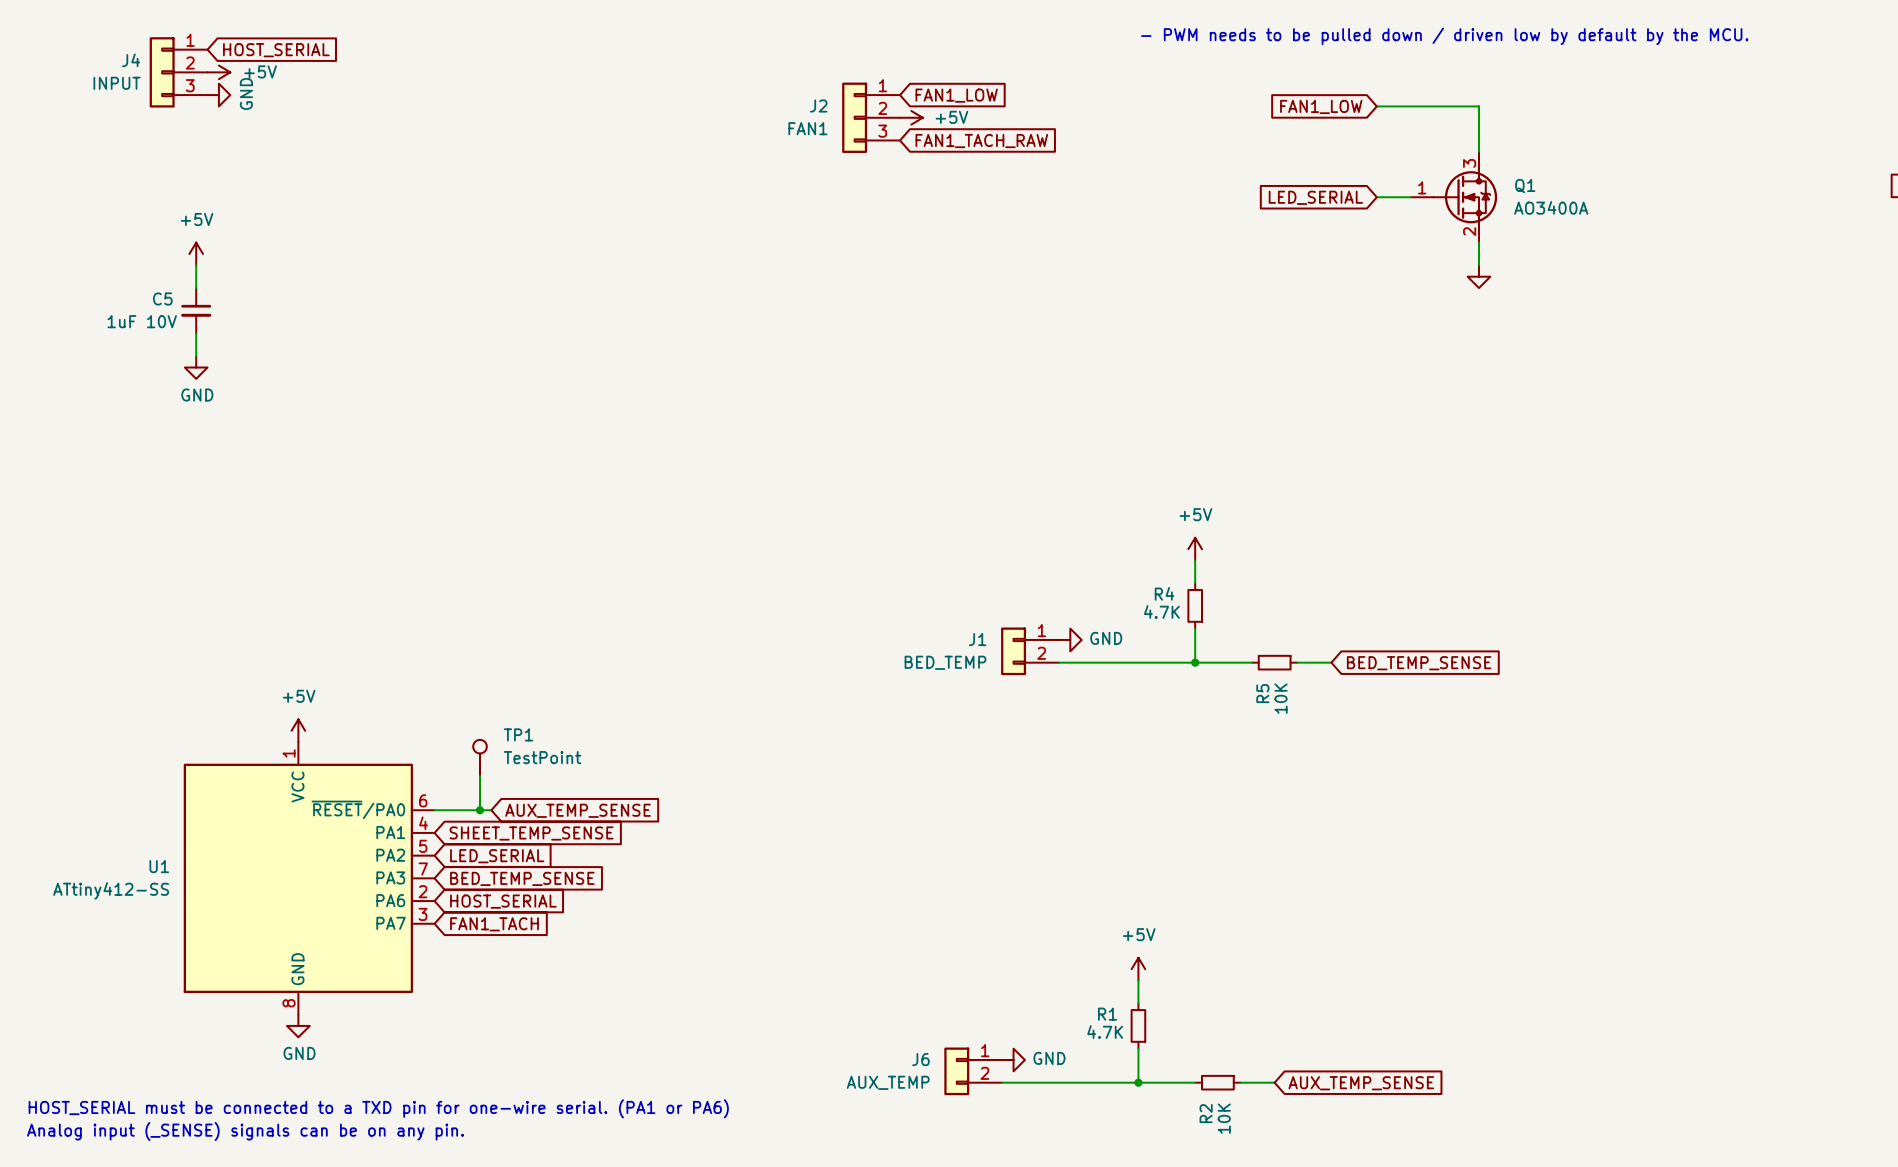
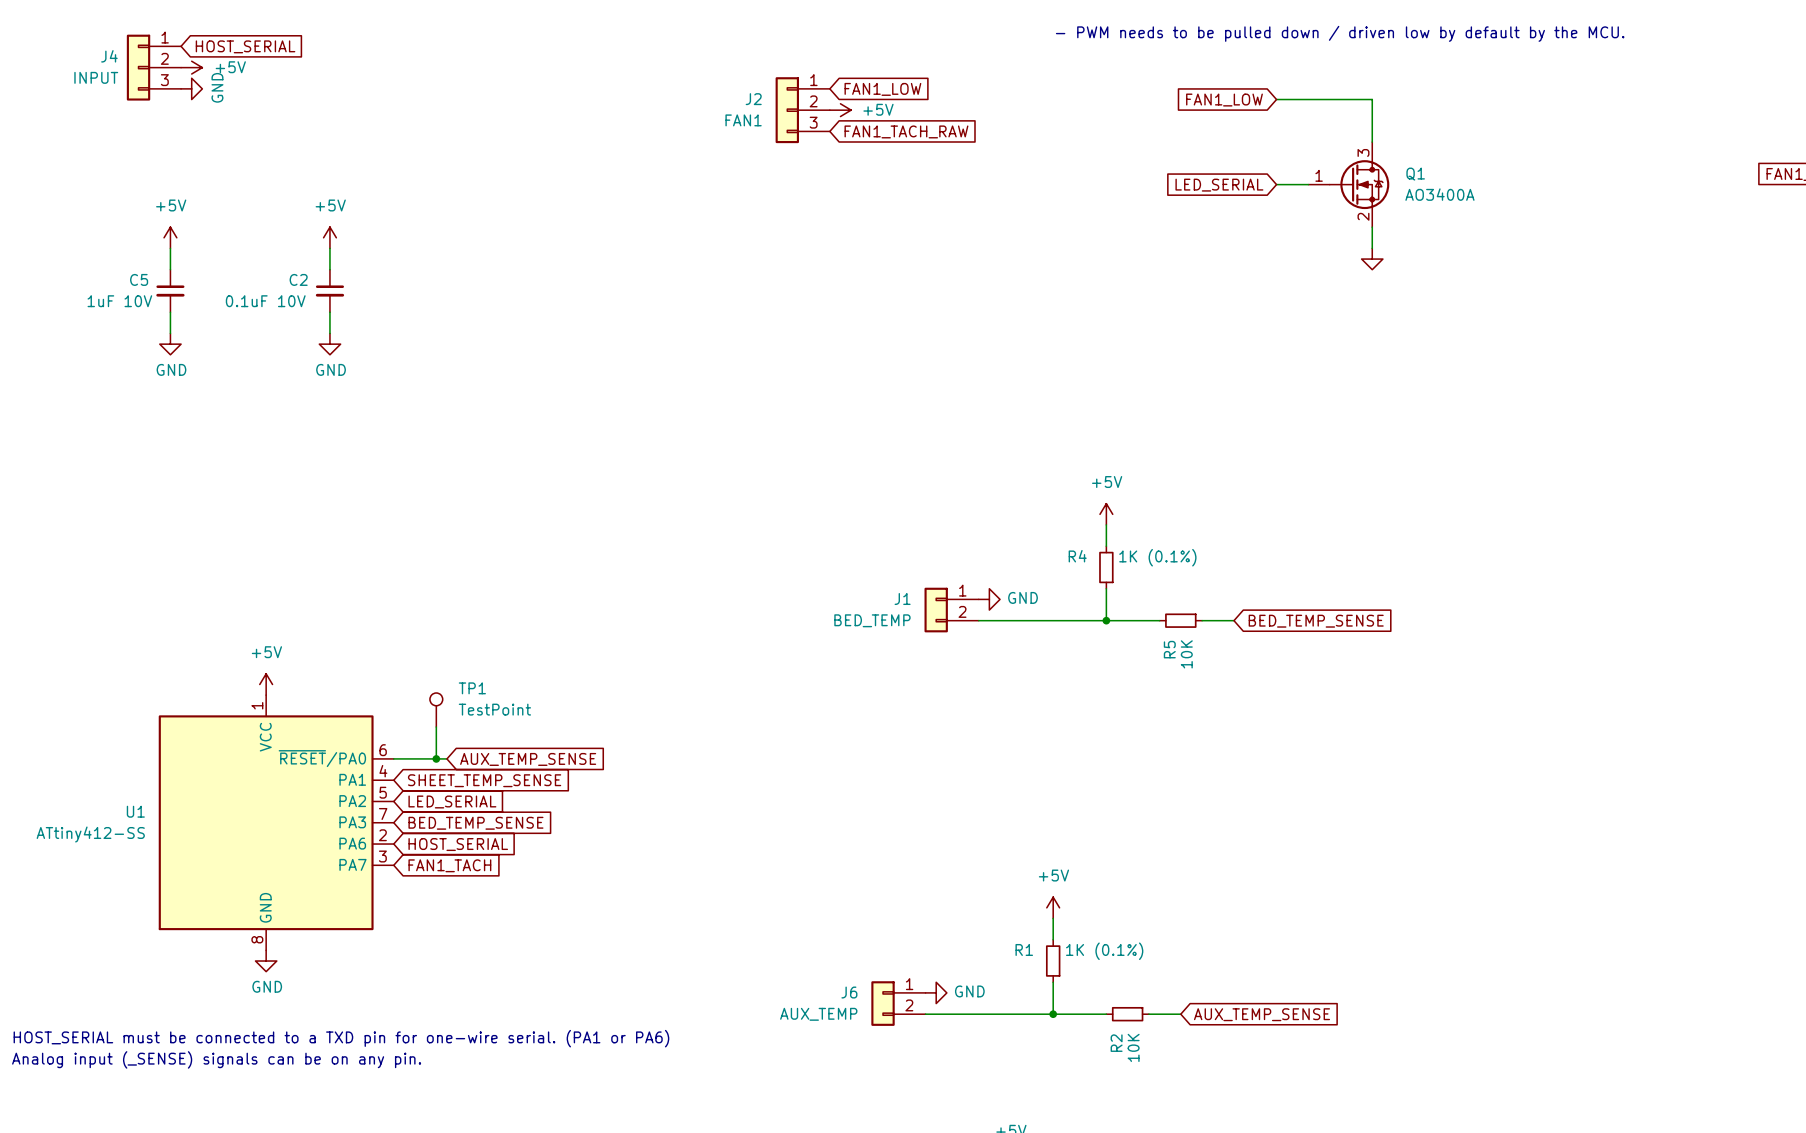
power symbol: none -> +5V (329, 237)
wire: none -> (329, 248) (329, 269)
C2: none -> 0.1uF 10V (329, 290)
wire: none -> (329, 312) (329, 333)
power symbol: none -> GND (329, 344)
R4 value: 4.7K (1161, 612) -> 1K (0.1%) (1157, 557)
R1 value: 4.7K (1105, 1032) -> 1K (0.1%) (1104, 951)

